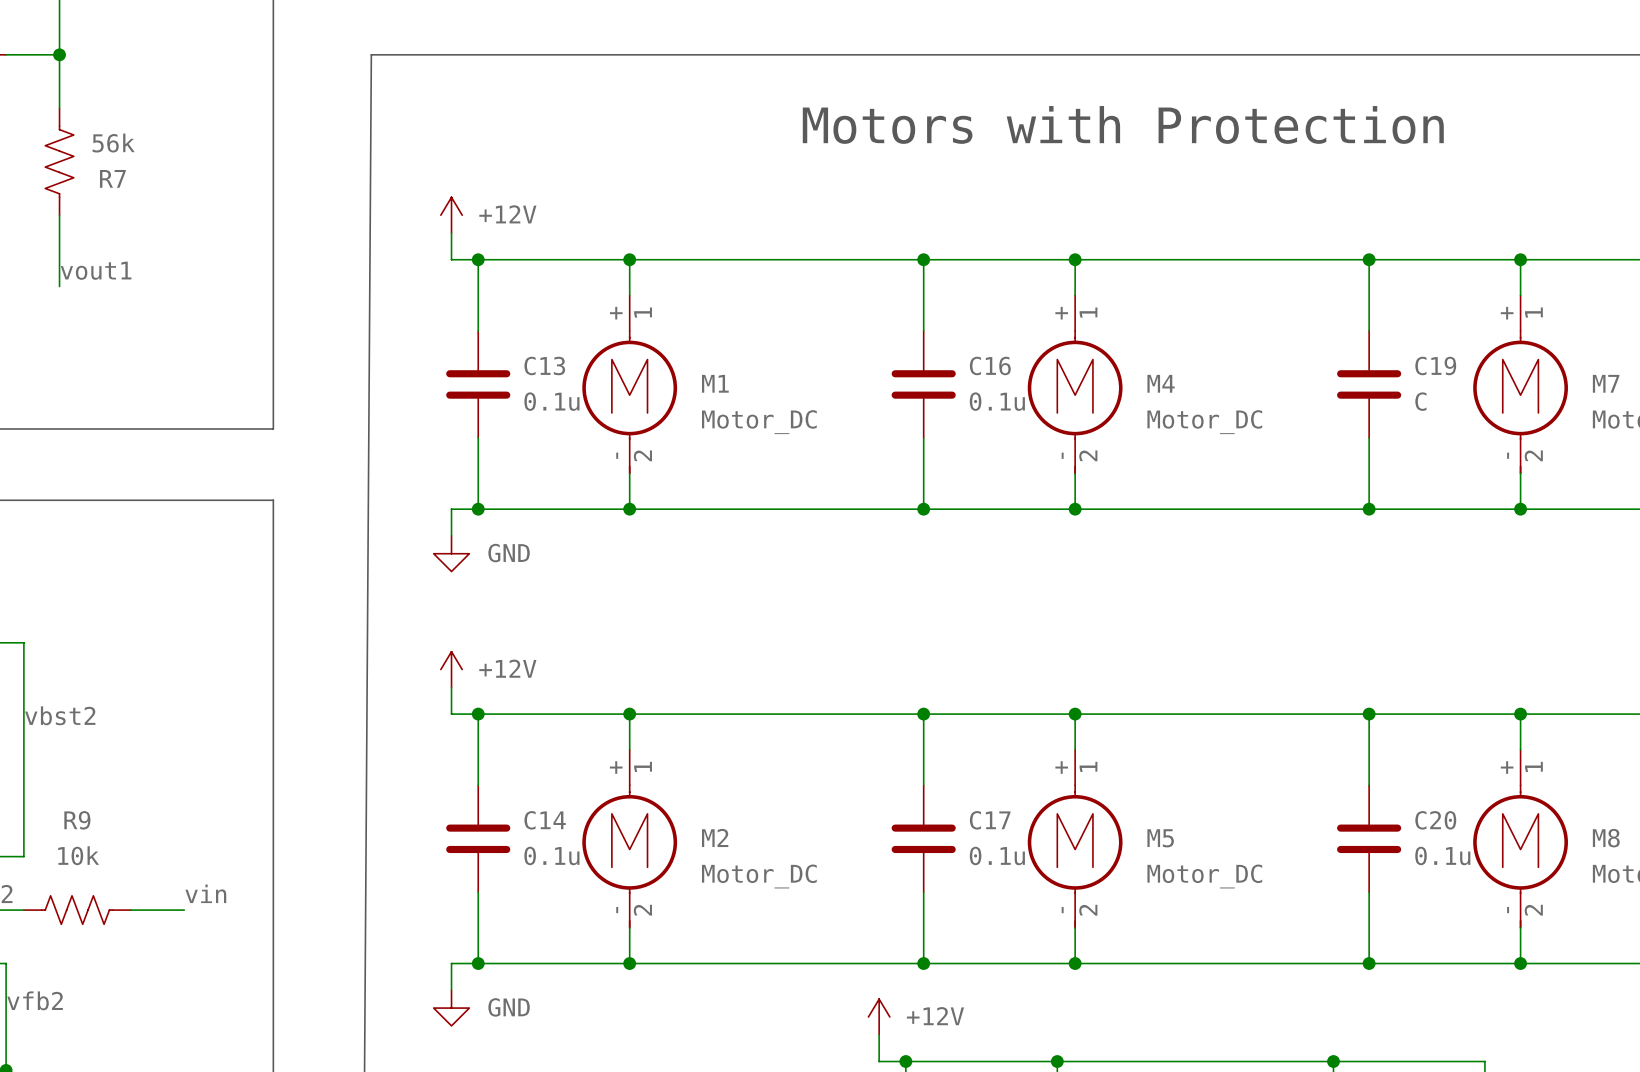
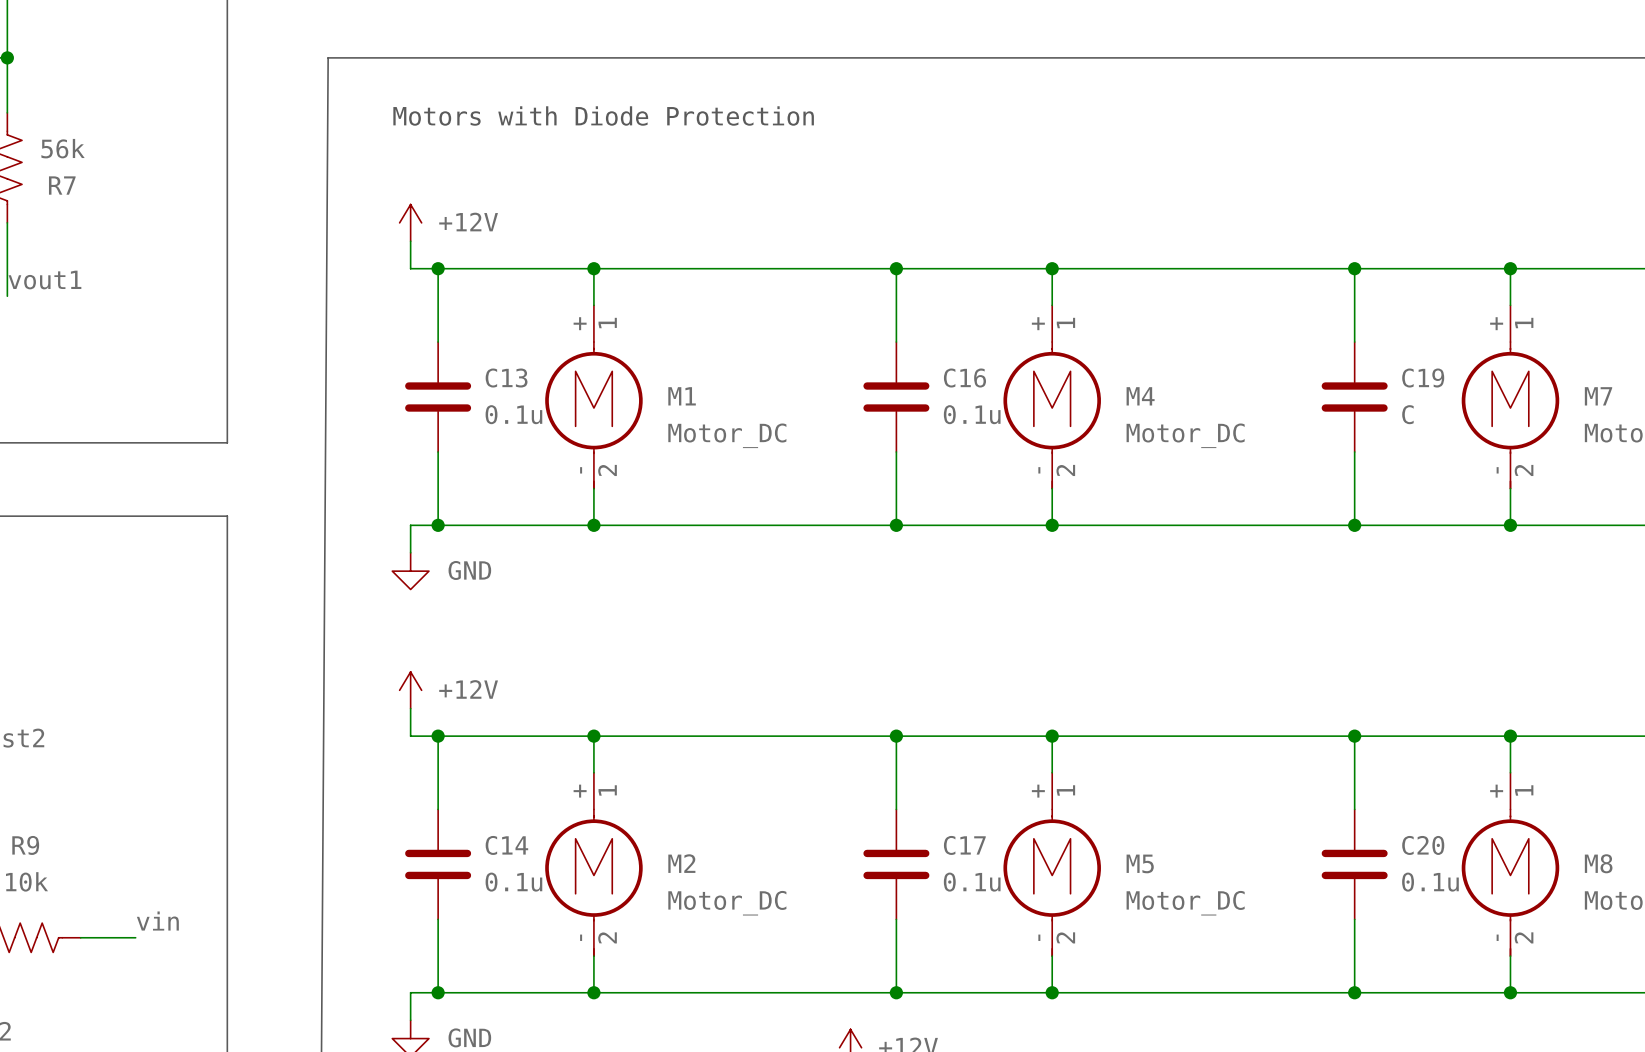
text: none -> Motors with Diode Protection (603, 115)
text: Motors with Protection (1123, 124) -> none

